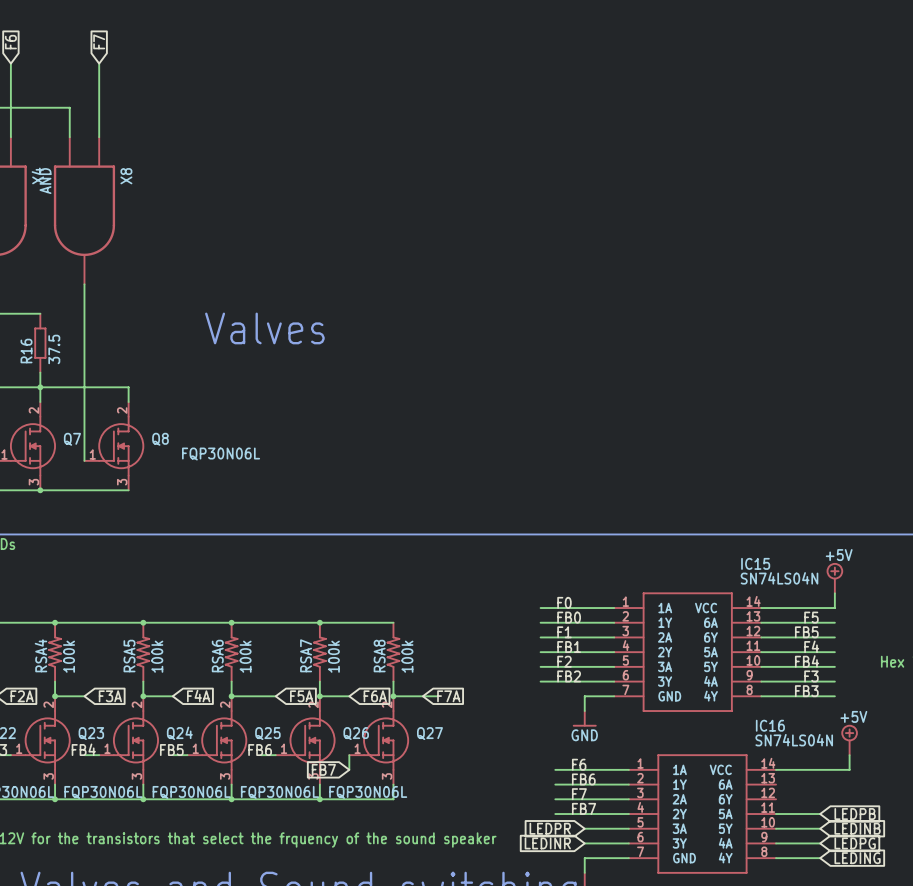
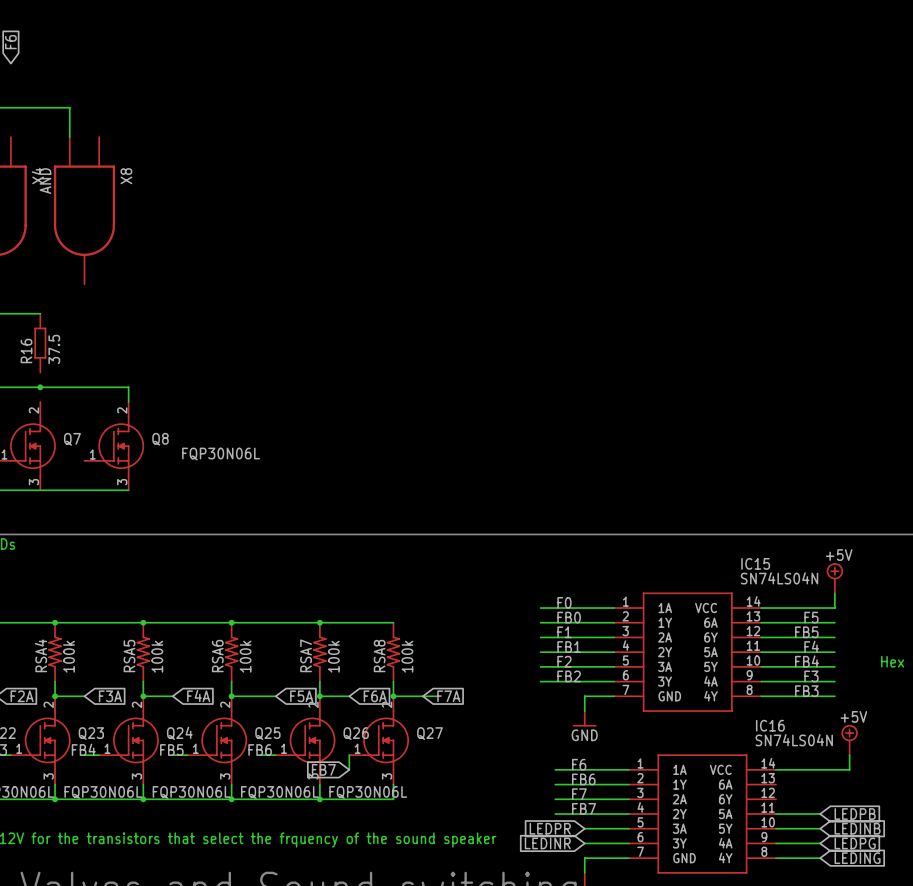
global label: F7 (99, 41) -> none
wire: (10, 63) (10, 137) -> none
wire: (99, 63) (99, 137) -> none
wire: (84, 284) (84, 460) -> none
text: Valves (264, 328) -> none
wire: (40, 372) (40, 402) -> none
junction: (40, 490) -> none

